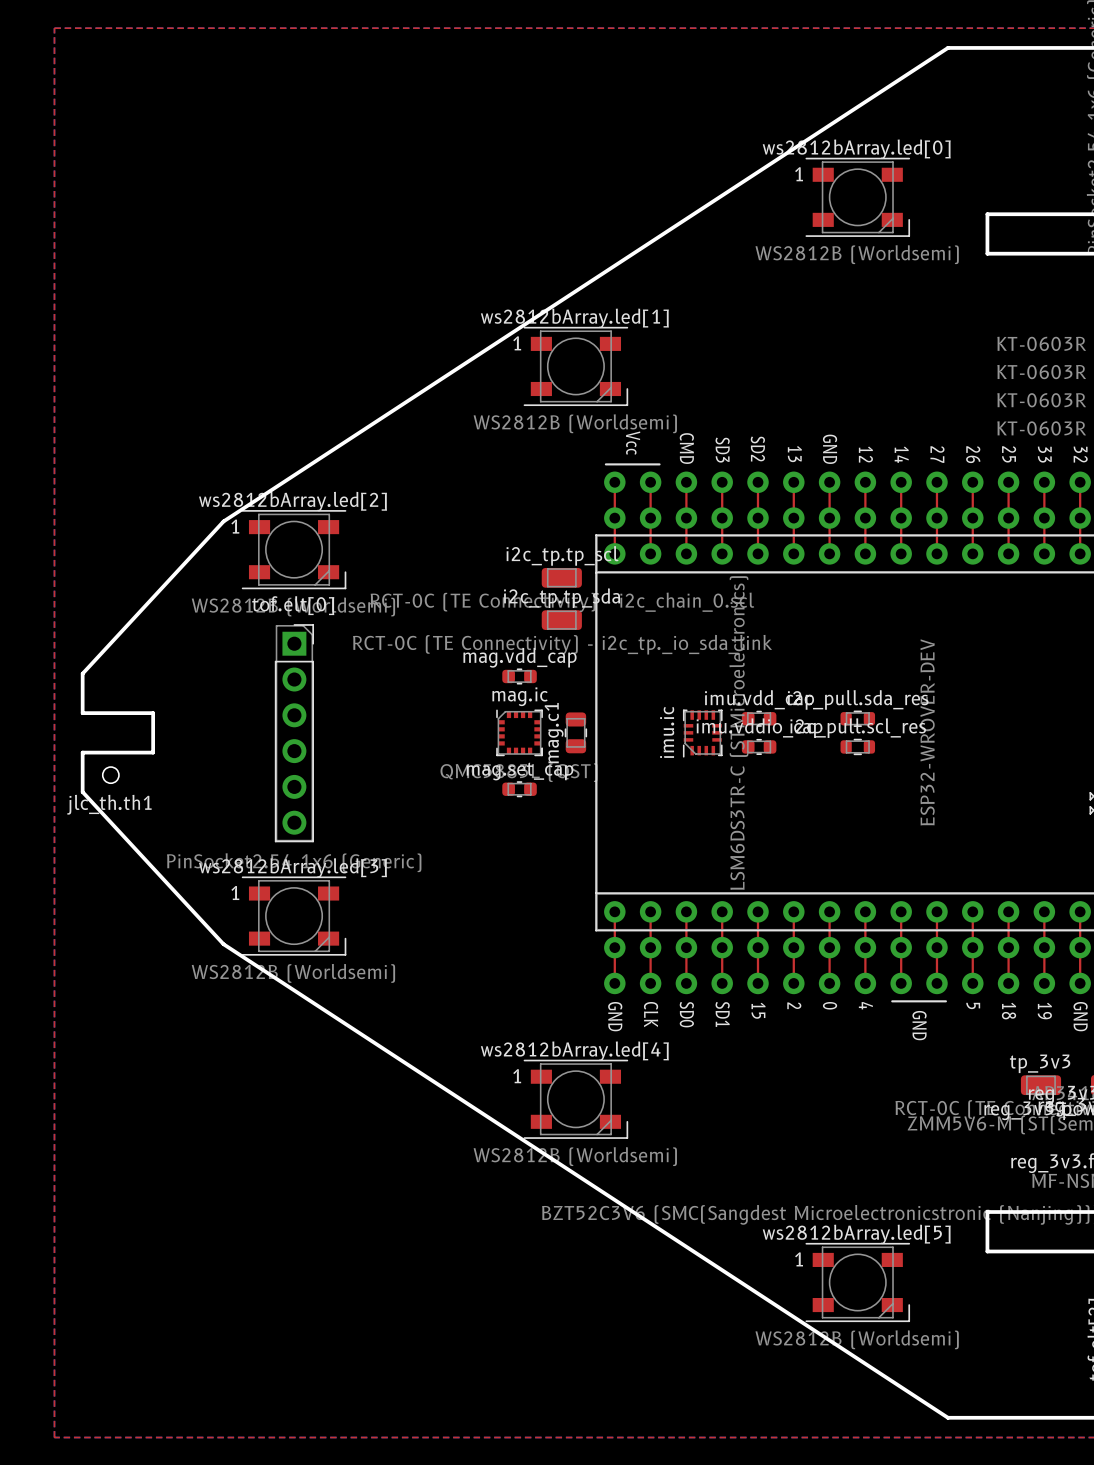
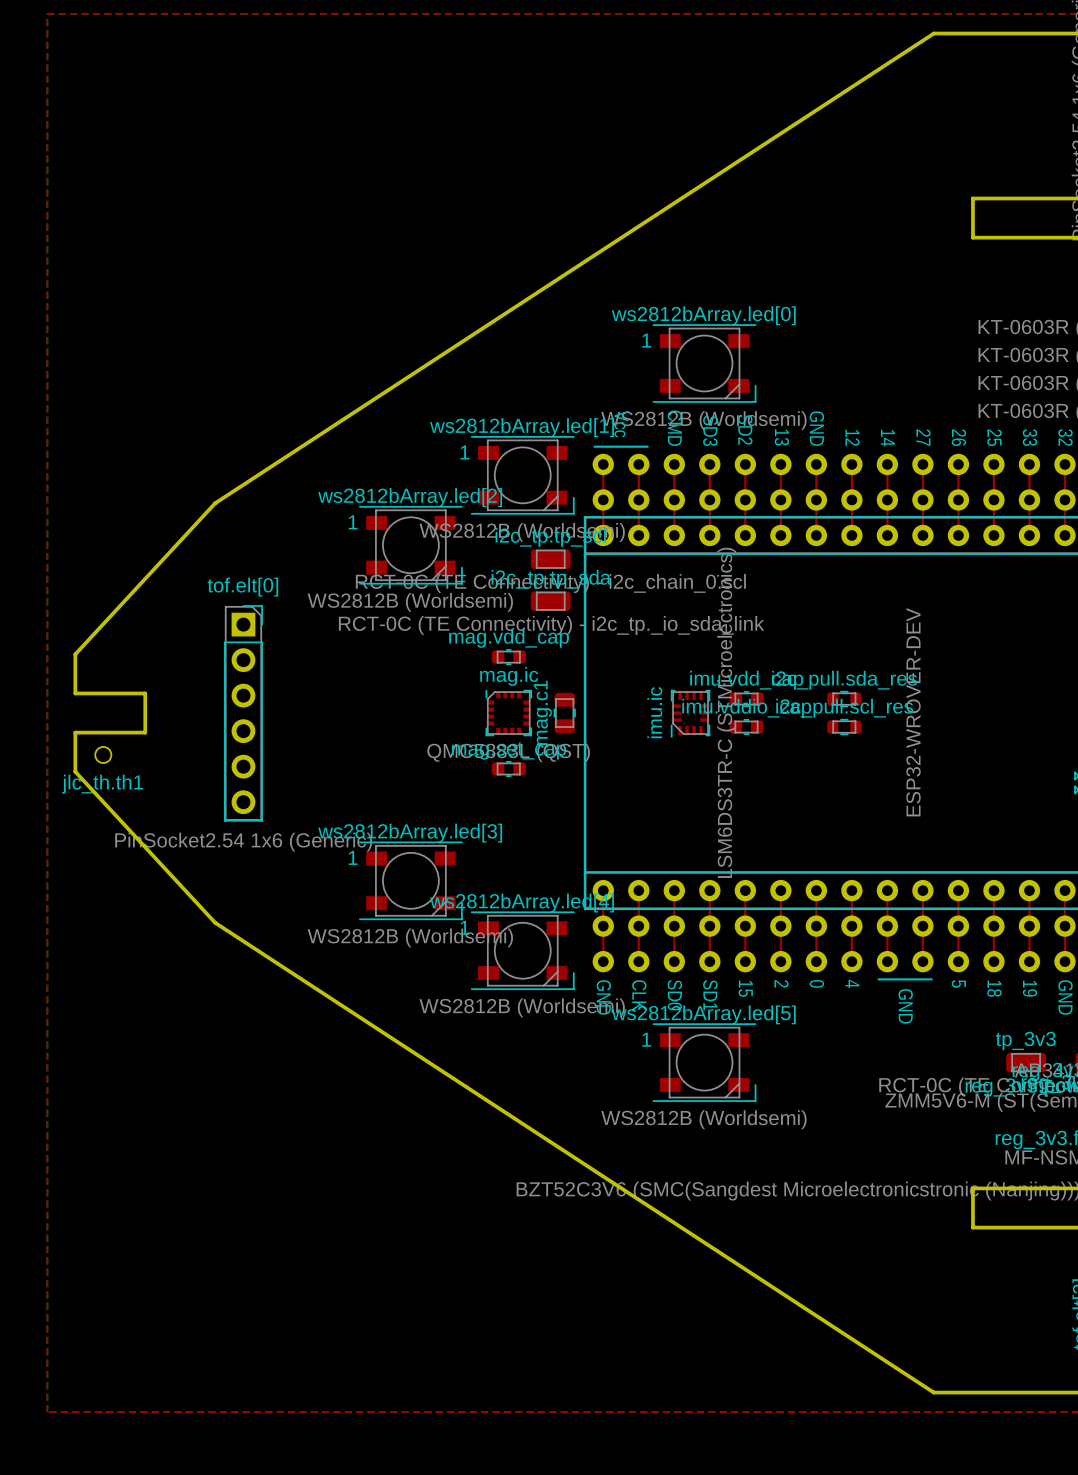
ws2812bArray.led[0] position: (857, 197) -> (704, 363)
ws2812bArray.led[1] position: (575, 366) -> (522, 475)
ws2812bArray.led[2] position: (294, 549) -> (410, 545)
tof.elt[0] position: (294, 733) -> (243, 713)
ws2812bArray.led[3] position: (294, 916) -> (410, 880)
ws2812bArray.led[4] position: (575, 1099) -> (522, 950)
ws2812bArray.led[5] position: (857, 1282) -> (704, 1062)

